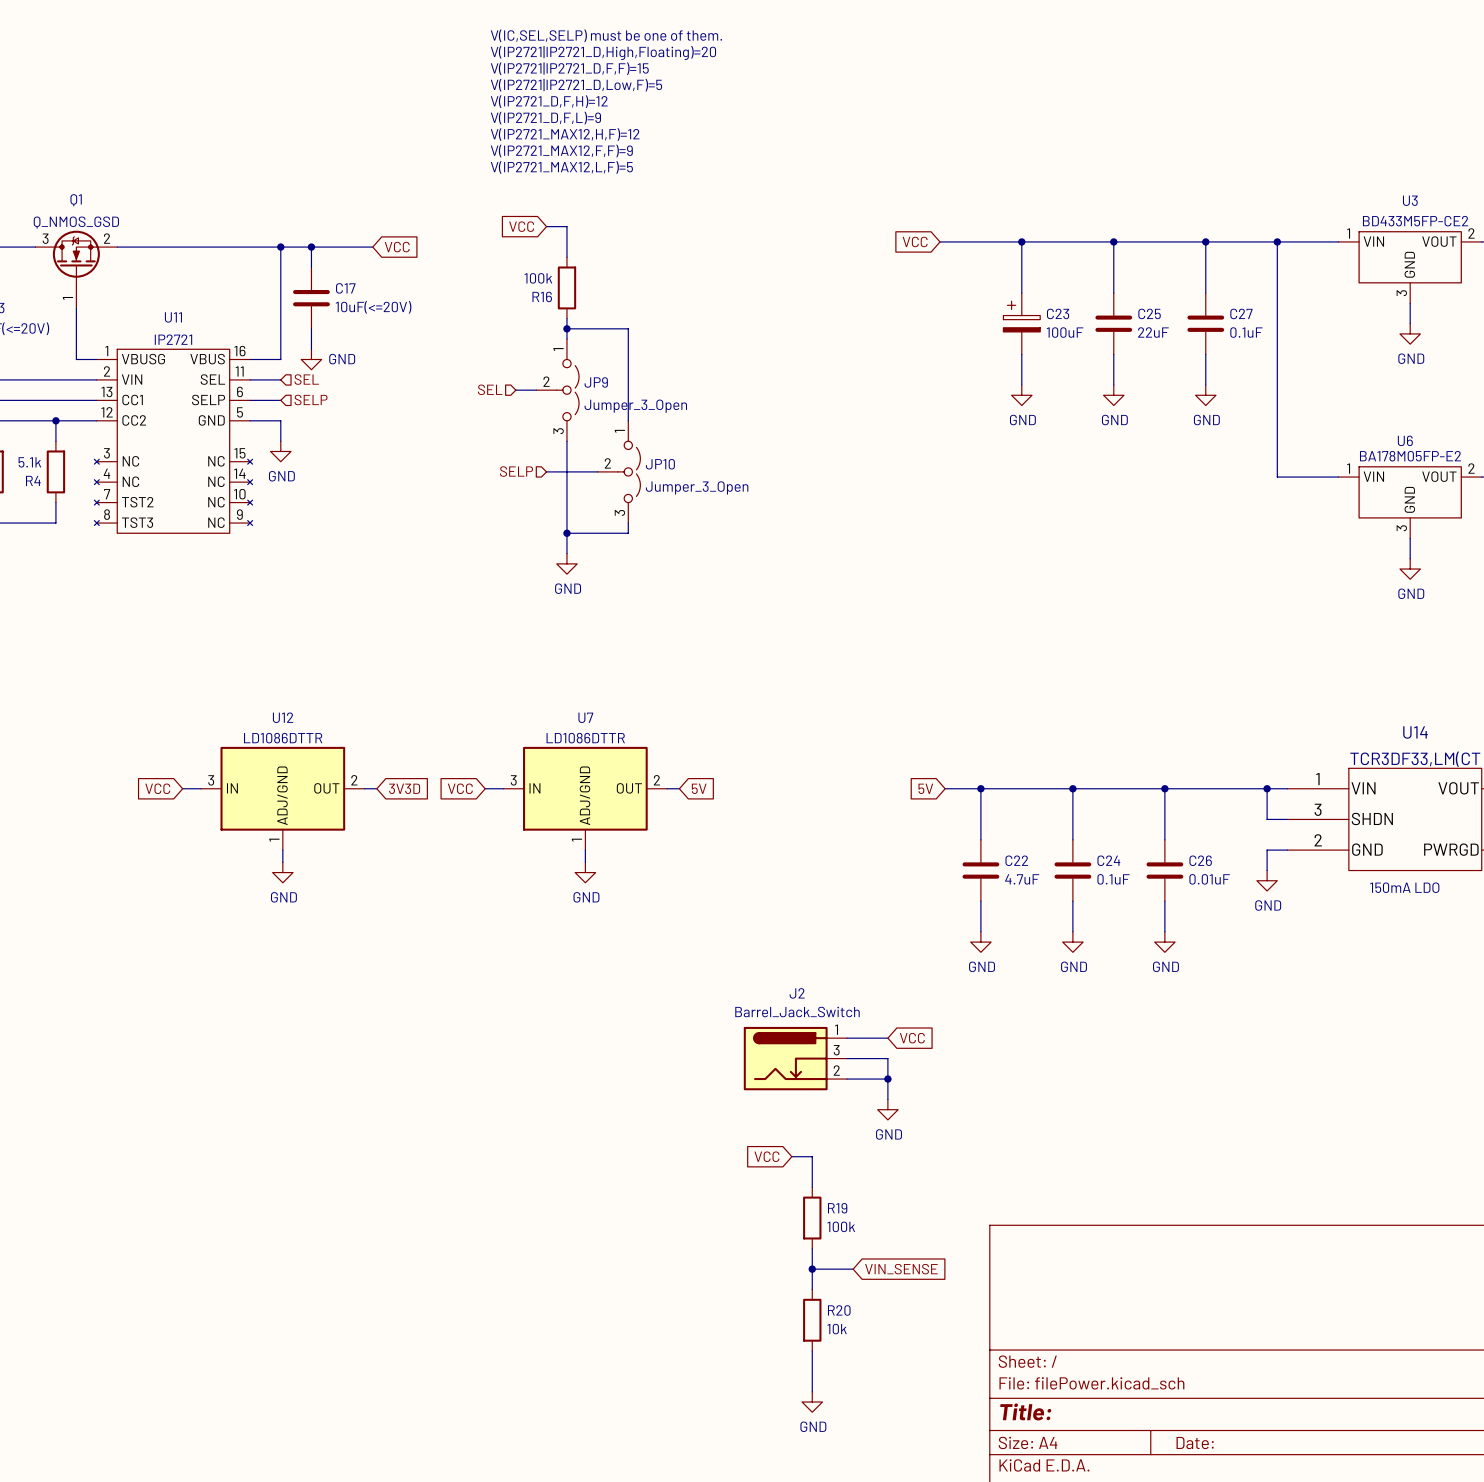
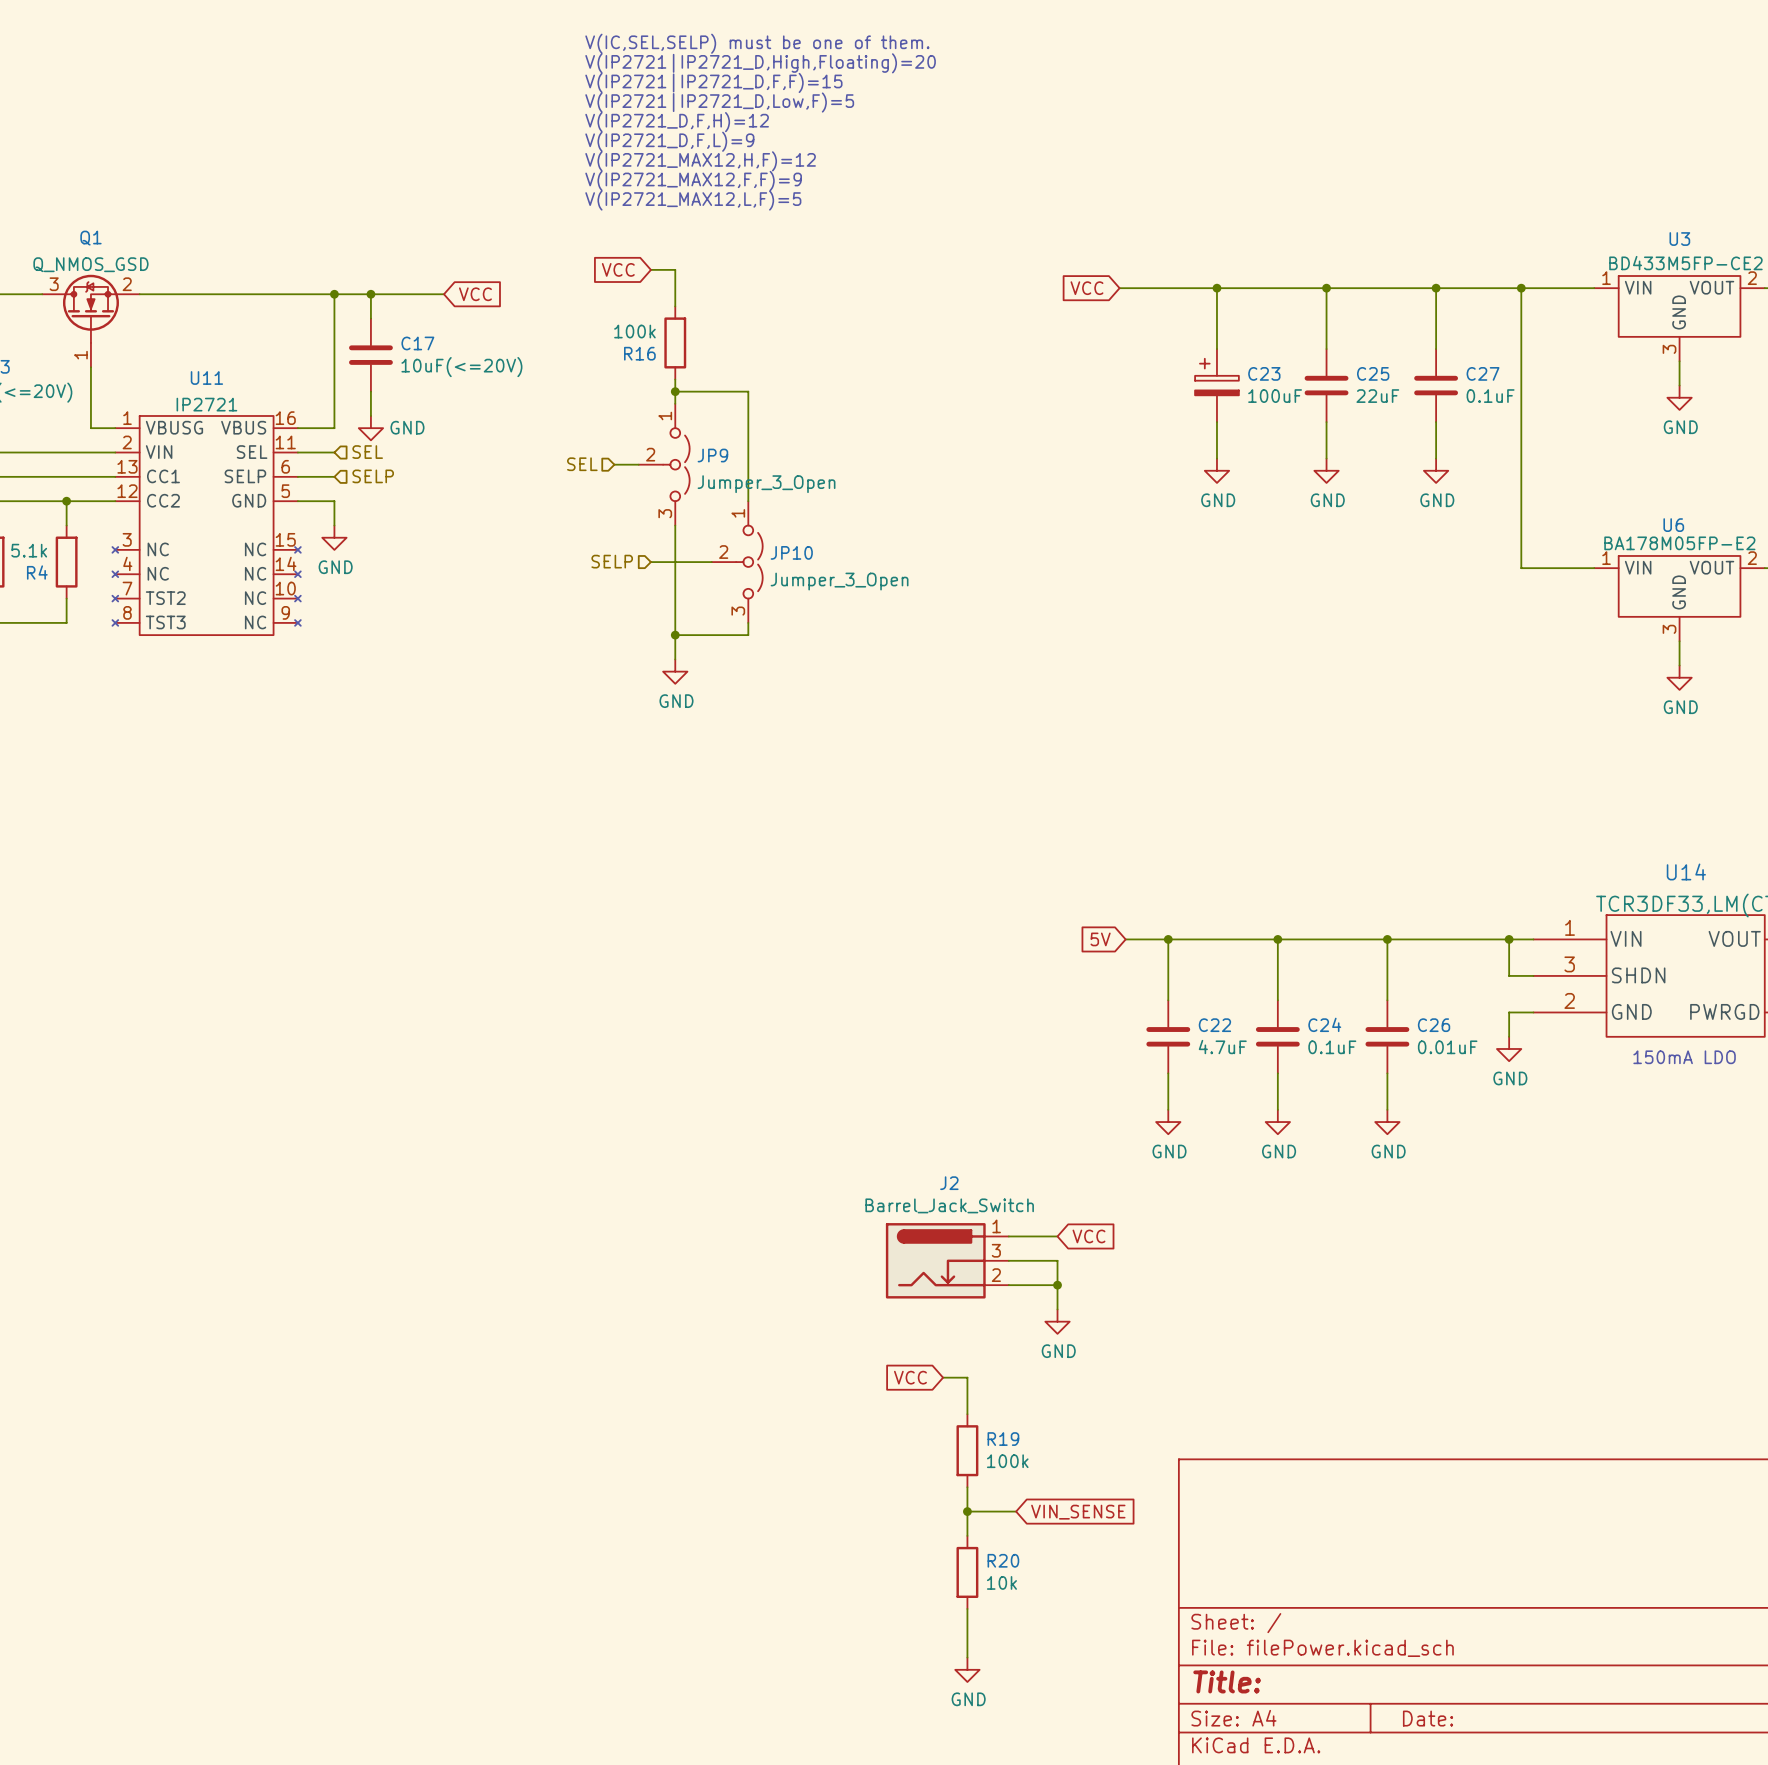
global label: VCC (157, 788) -> none
wire: (182, 788) (201, 788) -> none
wire: (364, 788) (376, 788) -> none
global label: 3V3D (404, 788) -> none
global label: VCC (460, 788) -> none
wire: (485, 788) (503, 788) -> none
wire: (667, 788) (679, 788) -> none
global label: 5V (699, 788) -> none
U12: LD1086DTTR (282, 798) -> none
U7: LD1086DTTR (585, 798) -> none
wire: (282, 850) (282, 862) -> none
wire: (585, 850) (585, 862) -> none
power symbol: GND (282, 872) -> none
power symbol: GND (585, 872) -> none

